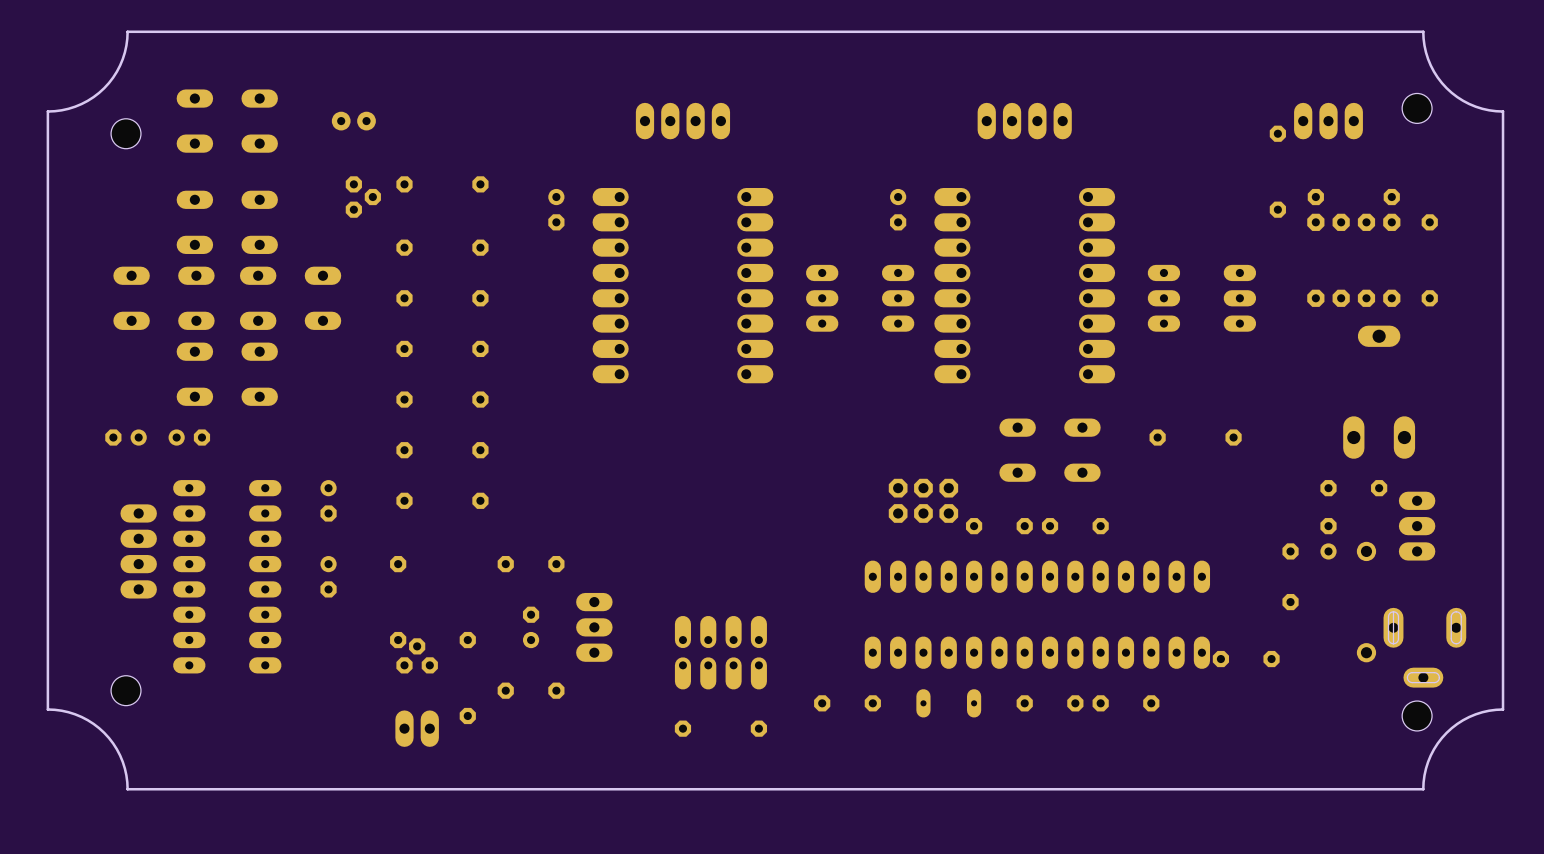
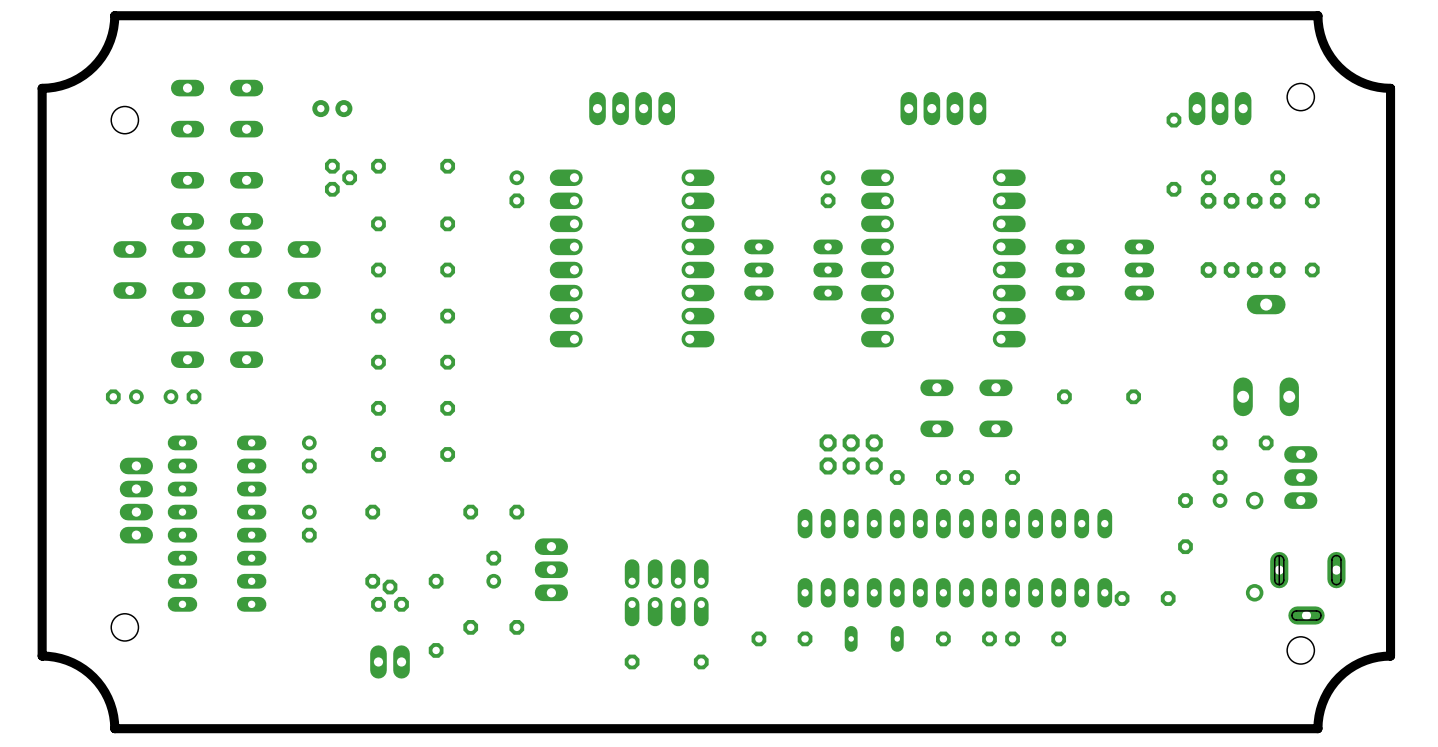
board edge: none -> (114, 15) (113, 28) (107, 46) (93, 67) (72, 81) (54, 87) (42, 88)
board edge: none -> (1317, 15) (114, 15)
board edge: none -> (1317, 15) (1319, 28) (1324, 46) (1339, 67) (1359, 81) (1377, 87) (1390, 88)
board edge: (1423, 31) (127, 31) (126, 45) (120, 65) (104, 88) (81, 104) (61, 110) (47, 111) (47, 709) (61, 710) (81, 716) (104, 732) (120, 755) (126, 775) (127, 789) (1423, 789) (1424, 775) (1430, 755) (1446, 732) (1469, 716) (1489, 710) (1503, 709) (1503, 111) (1489, 110) (1469, 104) (1446, 88) (1430, 65) (1424, 45) (1423, 31) -> none
board edge: none -> (42, 88) (42, 656)
board edge: none -> (1390, 88) (1390, 656)
board edge: none -> (42, 656) (54, 657) (72, 662) (93, 677) (107, 697) (113, 716) (114, 728)
board edge: none -> (1390, 656) (1377, 657) (1359, 662) (1339, 677) (1324, 697) (1319, 716) (1317, 728)
board edge: none -> (1317, 728) (114, 728)

